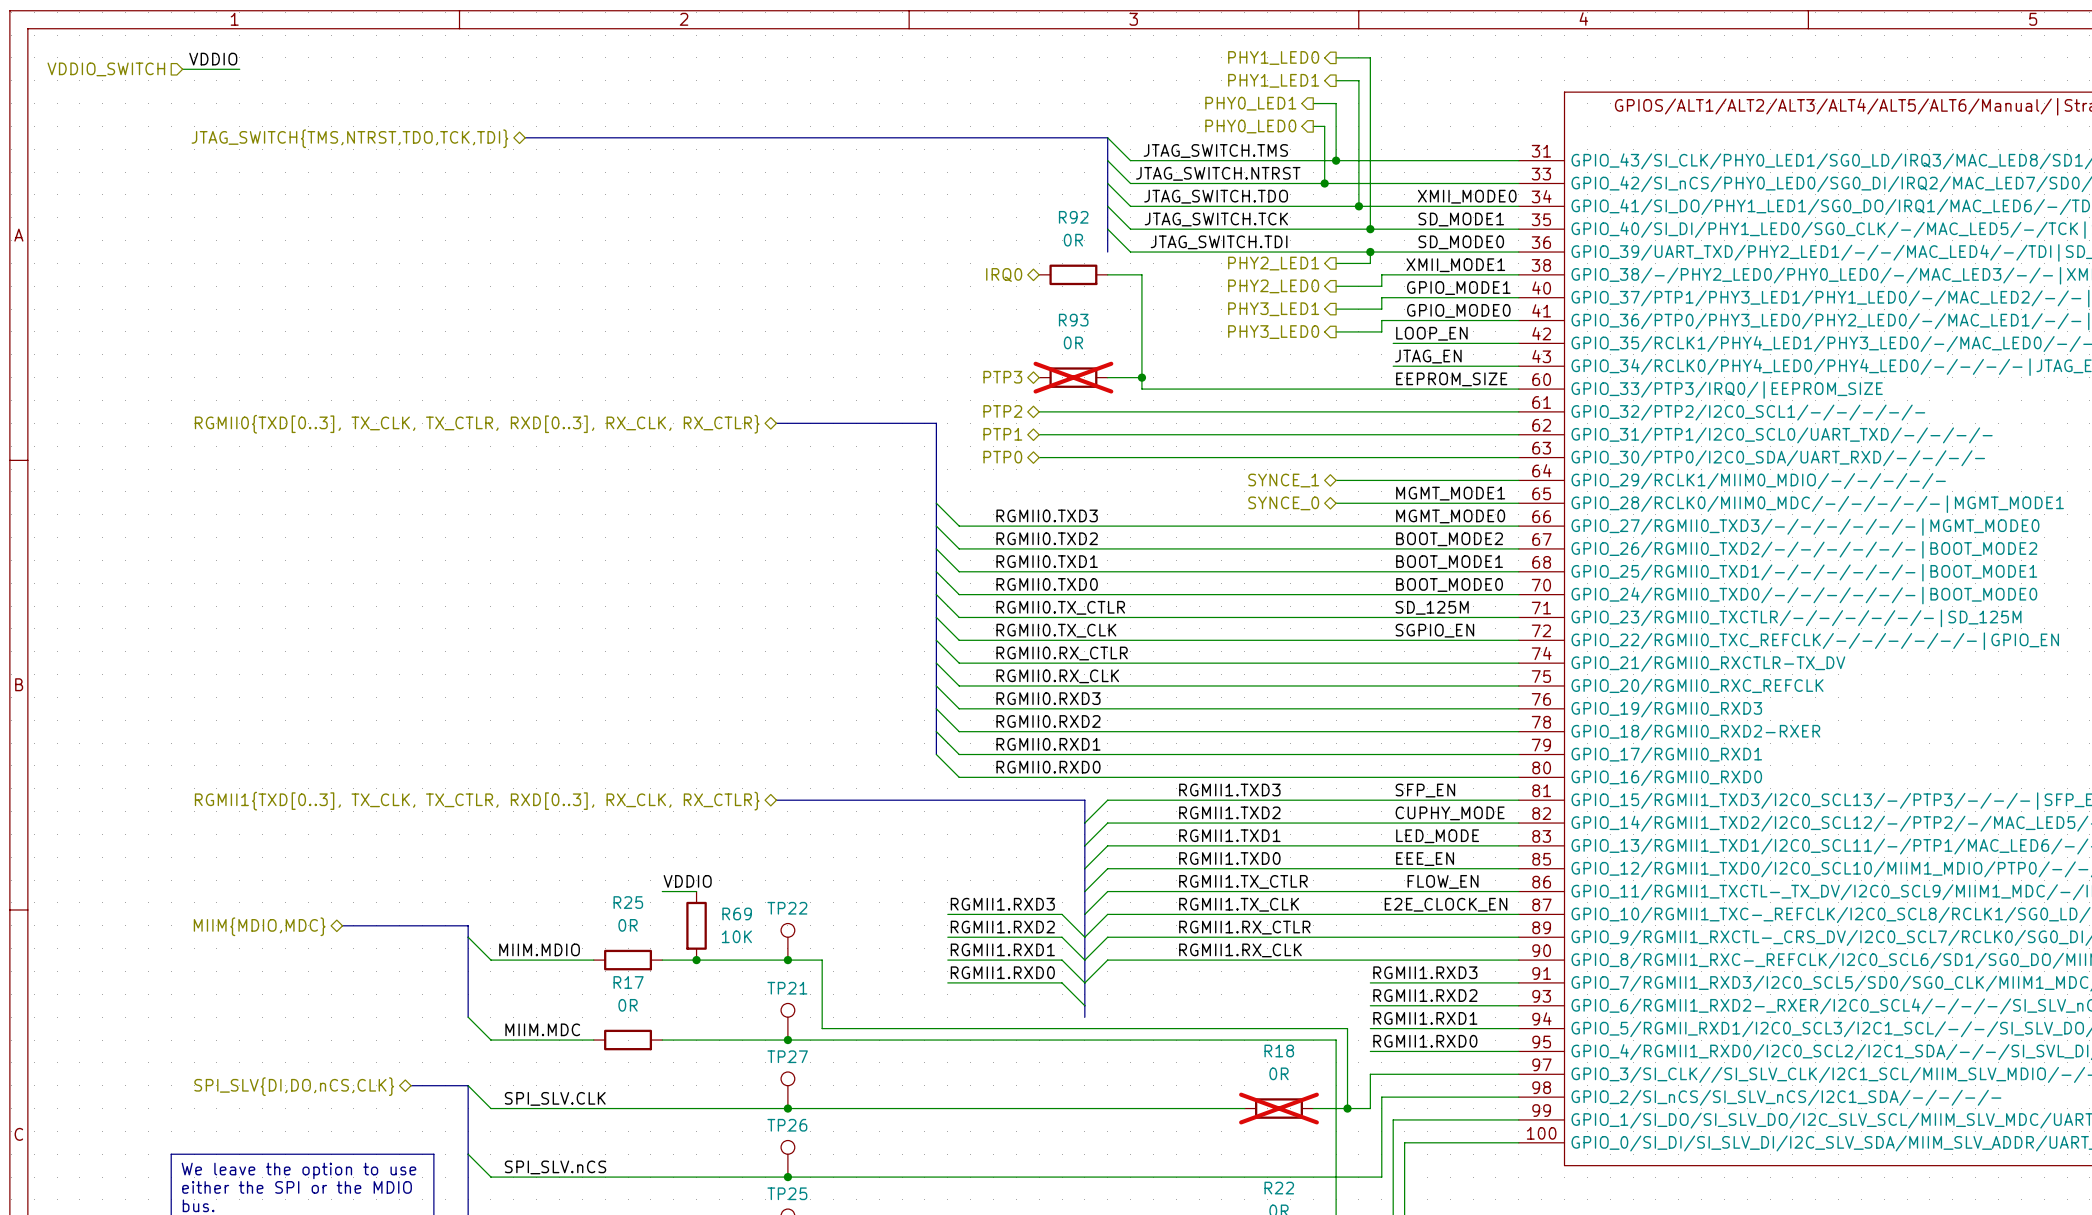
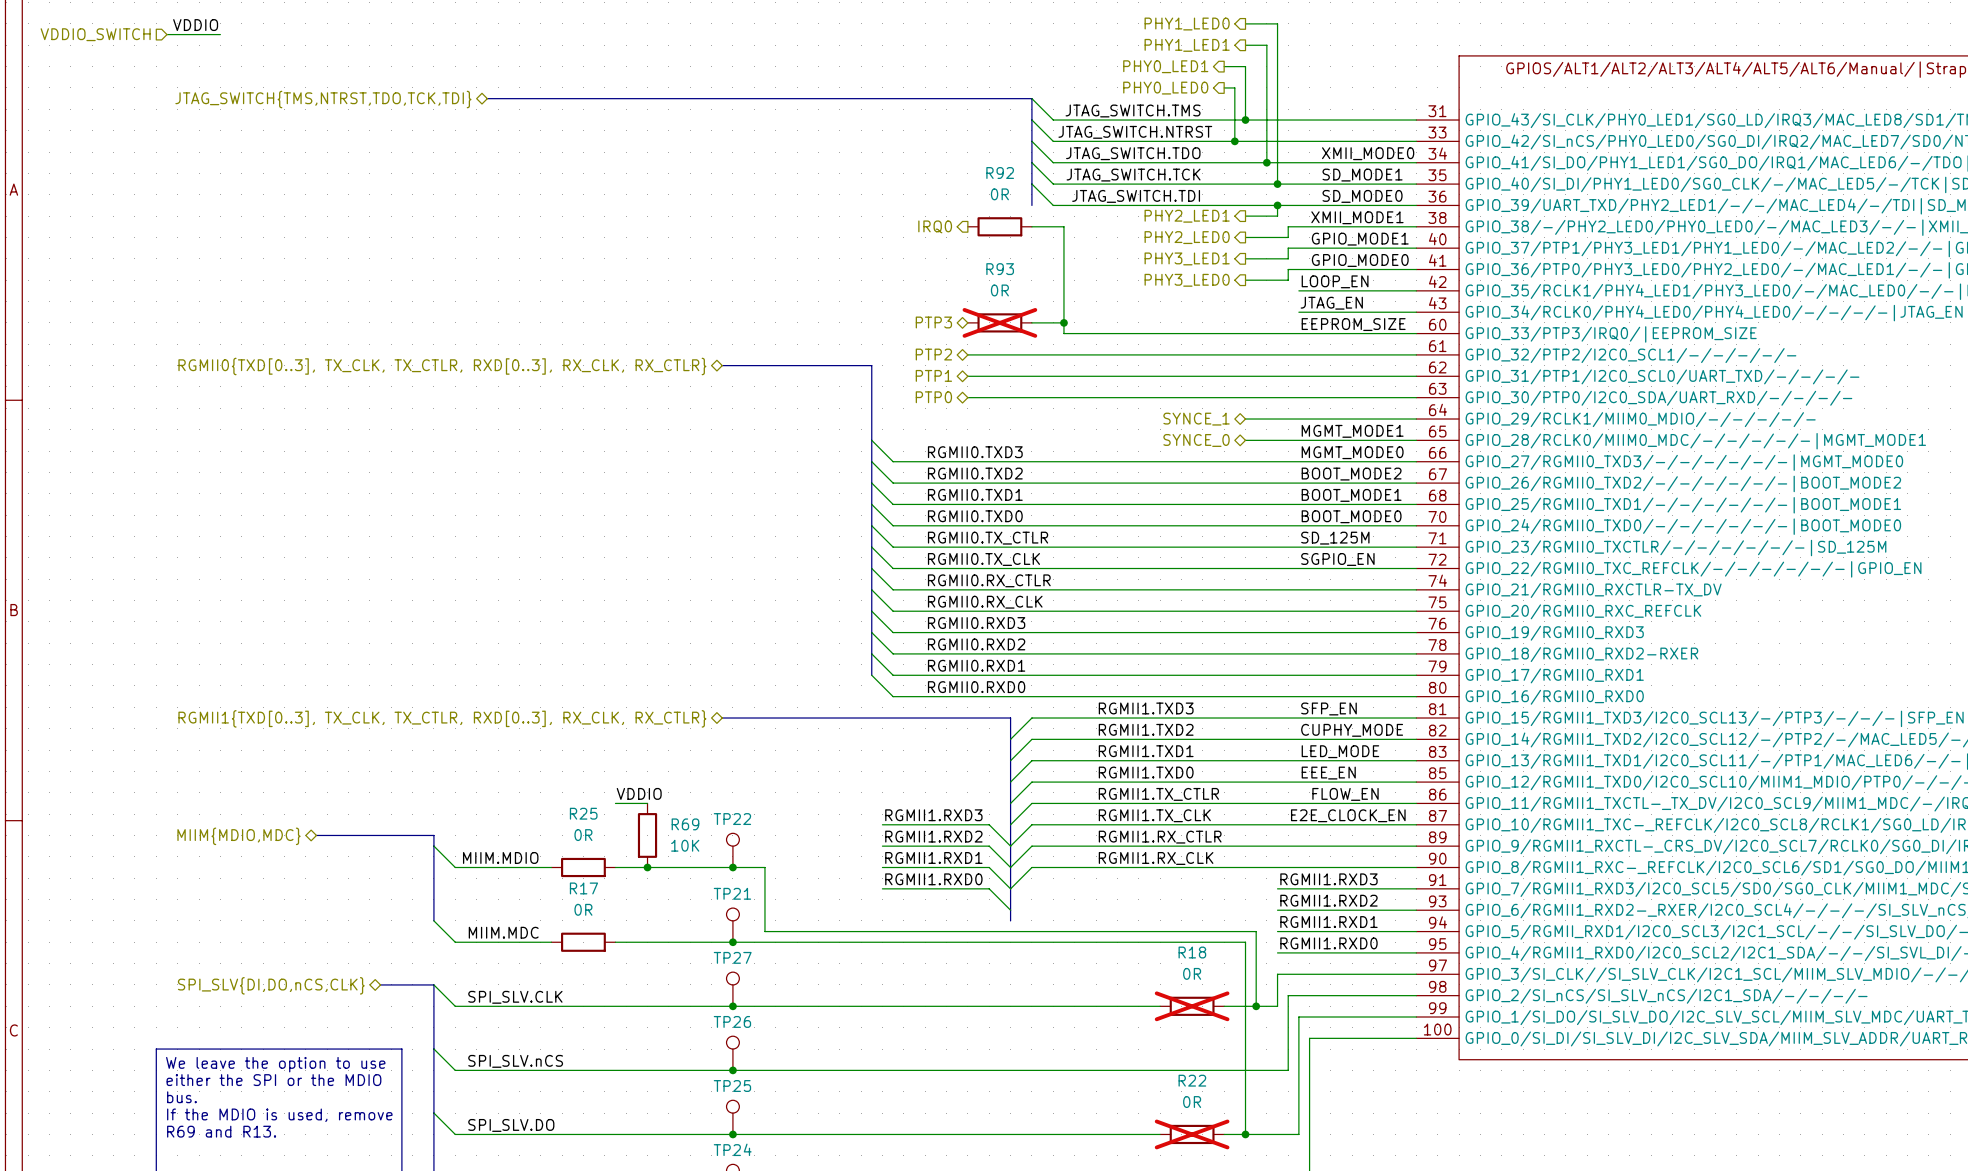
hierarchical label shape: bidirectional (1004, 274) -> output (935, 226)

